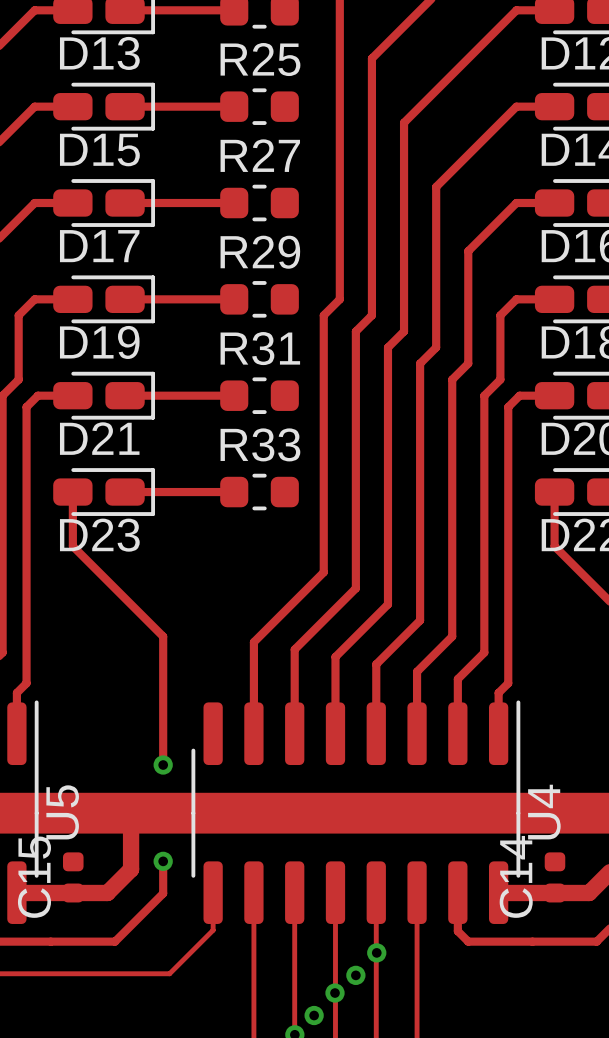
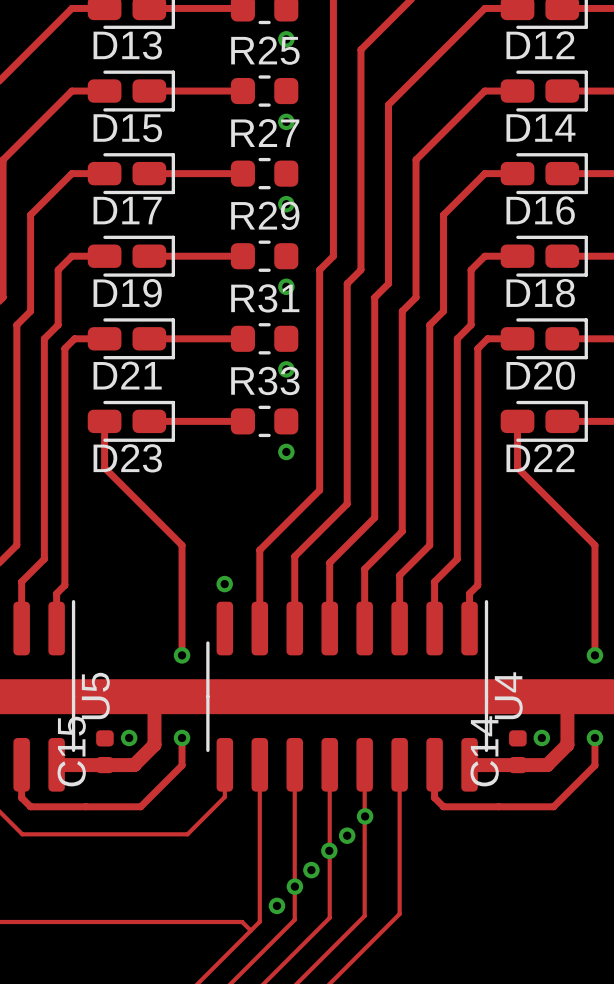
via: none -> (286, 39)
via: none -> (286, 121)
via: none -> (286, 204)
via: none -> (286, 286)
via: none -> (286, 369)
via: none -> (286, 451)
via: none -> (224, 584)
via: none -> (129, 737)
via: none -> (541, 737)

